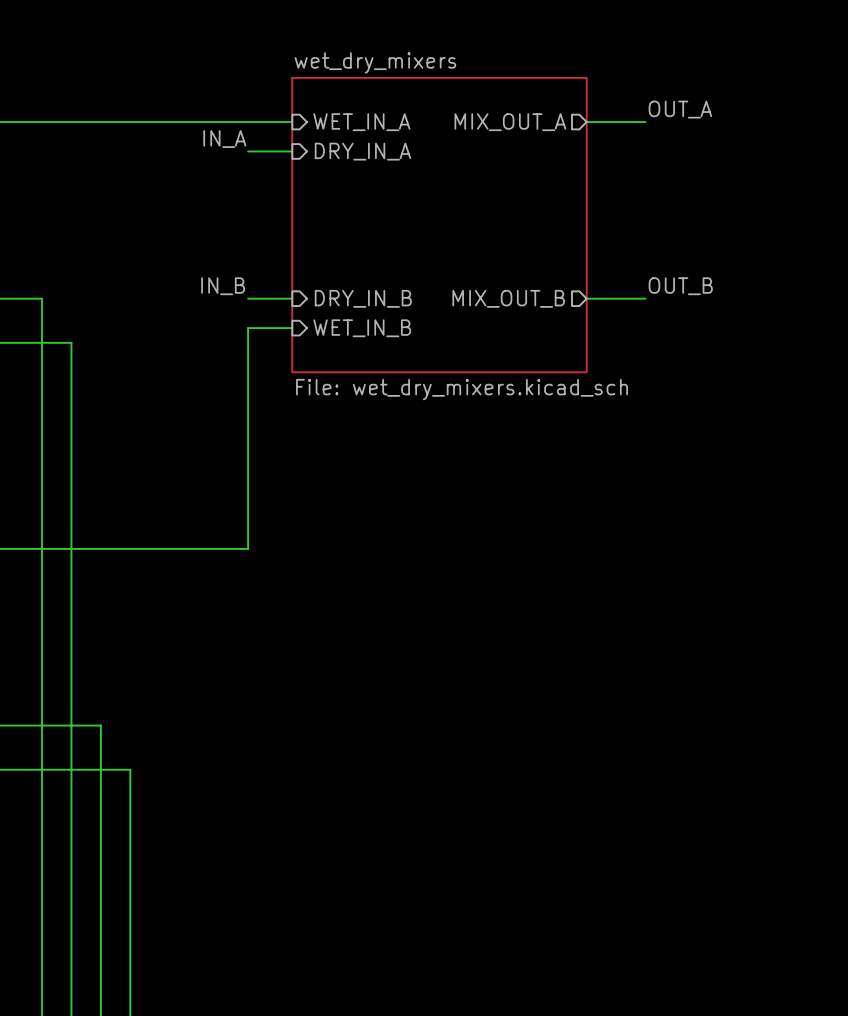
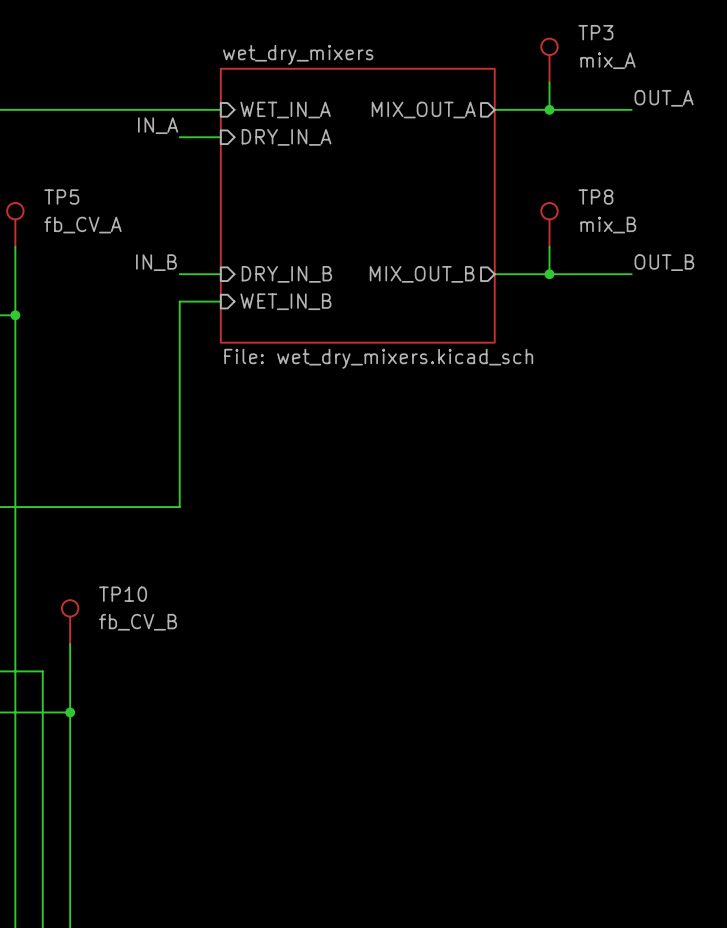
TP3: none -> mix_A (549, 60)
wire: none -> (549, 82) (549, 109) (631, 109)
label position: OUT_A (680, 109) -> OUT_A (664, 98)
junction: none -> (549, 109)
TP5: none -> fb_CV_A (15, 224)
TP8: none -> mix_B (549, 224)
wire: none -> (15, 246) (15, 315)
wire: none -> (549, 246) (549, 274) (631, 274)
label position: OUT_B (680, 286) -> OUT_B (664, 262)
junction: none -> (549, 274)
junction: none -> (15, 315)
TP10: none -> fb_CV_B (70, 622)
wire: none -> (70, 644) (70, 712)
junction: none -> (70, 712)

